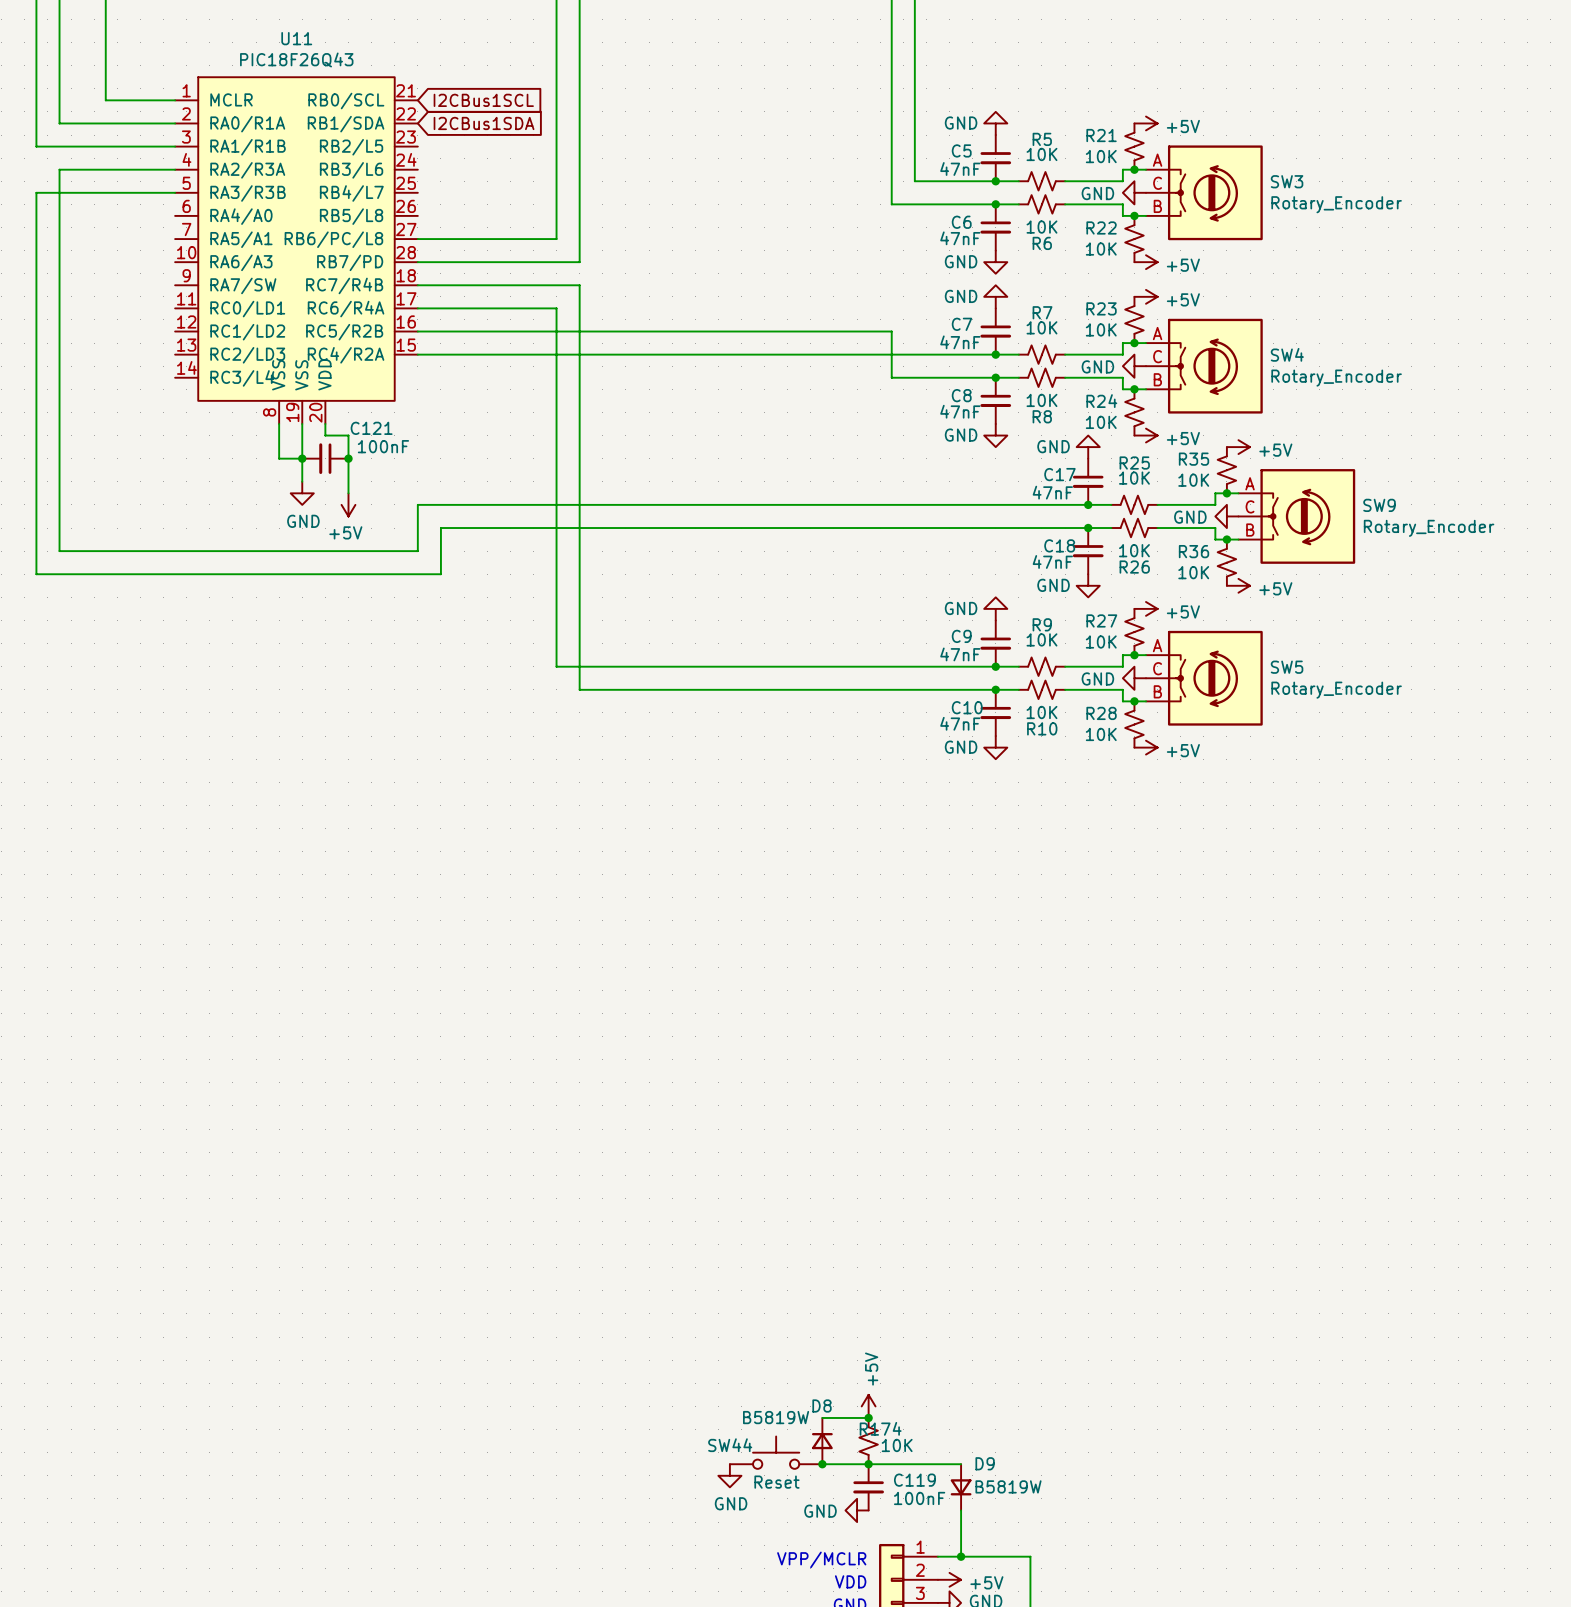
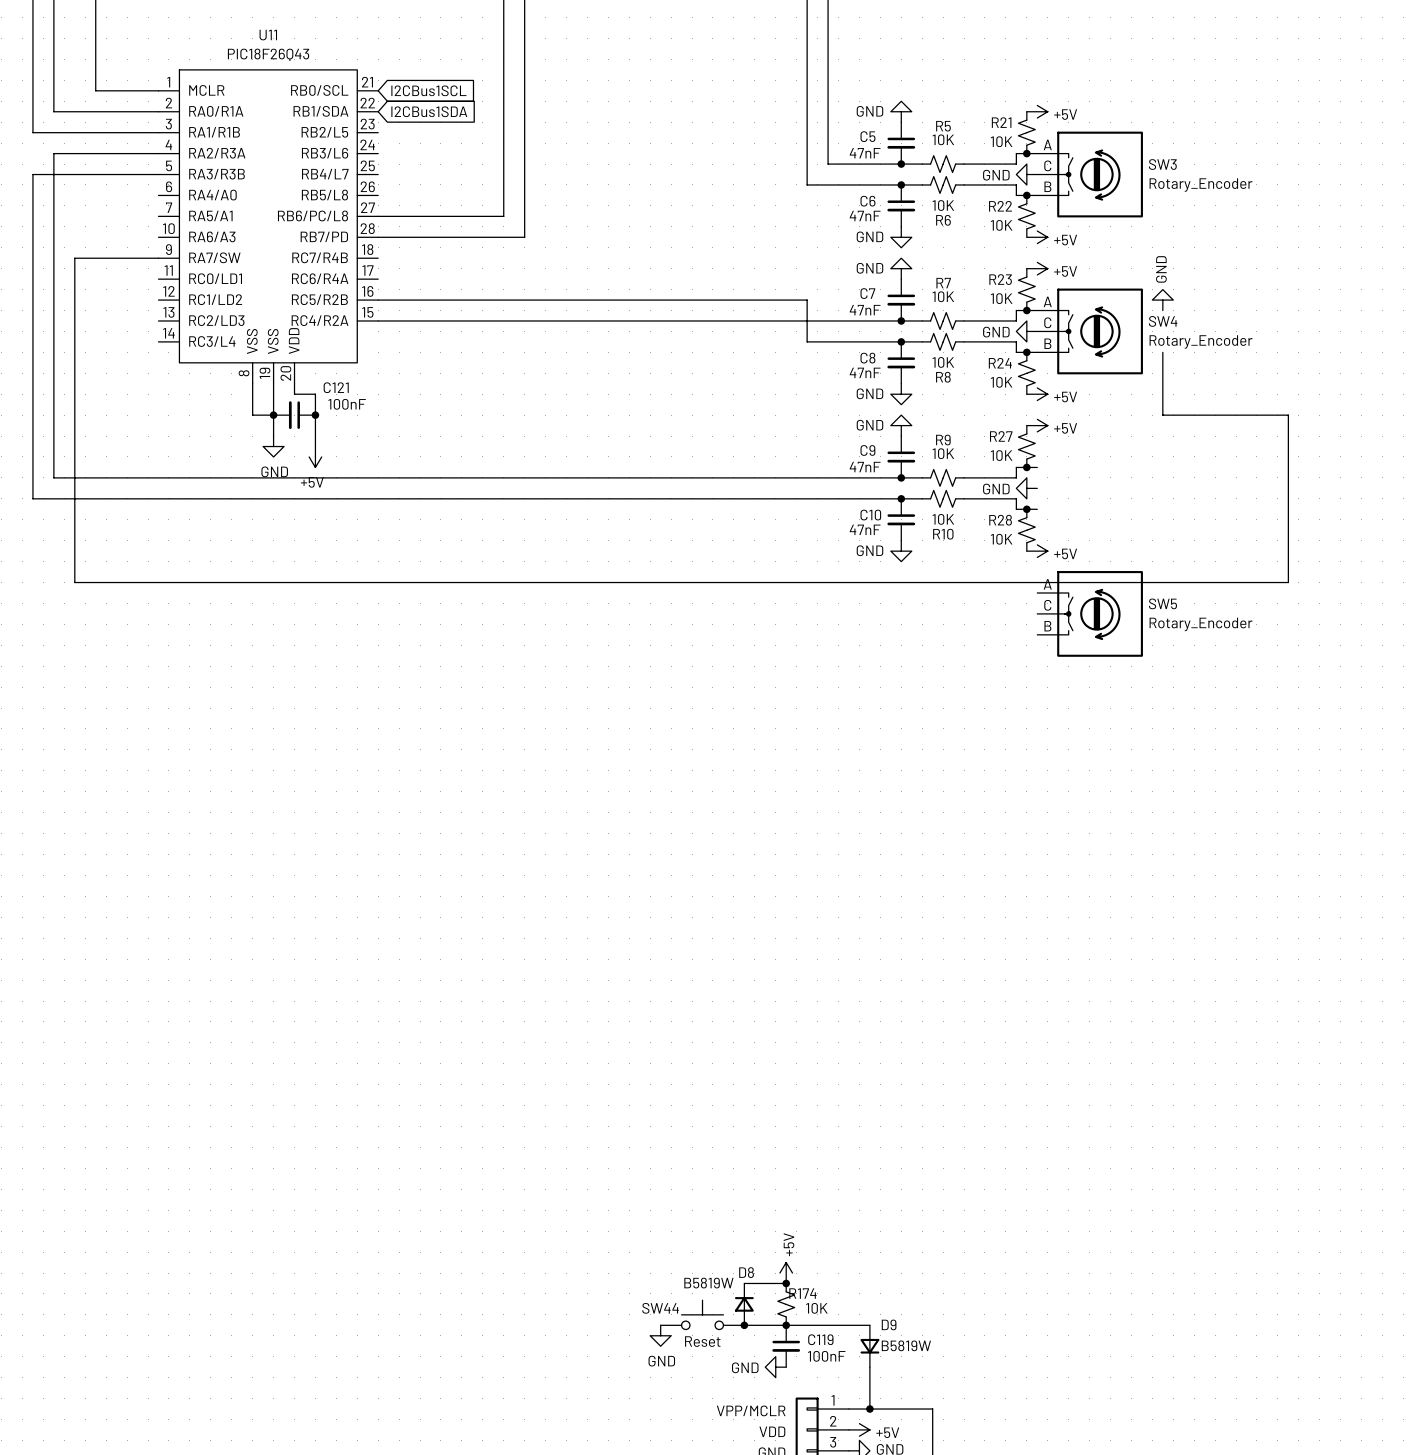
wire: none -> (158, 258) (74, 258) (74, 582) (1288, 582) (1288, 415) (1162, 415) (1162, 352)
wire: (417, 285) (579, 285) (579, 689) (1018, 689) -> none
wire: (417, 308) (556, 308) (556, 666) (1018, 666) -> none
power symbol: none -> GND (1162, 300)
power symbol: GND (1088, 447) -> none
power symbol: +5V (1238, 447) -> none
power symbol: none -> GND (901, 425)
power symbol: none -> +5V (1037, 425)
R35: 10K (1226, 470) -> none
C17: 47nF (1088, 481) -> none
junction: (1226, 493) -> none
wire: (1238, 493) (1215, 493) (1215, 504) (1157, 504) -> none
junction: (1088, 504) -> none
wire: (1111, 504) (417, 504) (417, 551) -> (922, 498) (378, 498)
R25: 10K (1134, 504) -> none
junction: none -> (1026, 467)
wire: none -> (1037, 467) (1016, 467) (1016, 477) (1005, 477)
power symbol: GND (1226, 516) -> none
SW9: Rotary_Encoder (1296, 516) -> none
wire: (59, 528) (59, 551) -> (32, 498) (53, 498)
wire: (440, 528) (440, 574) (36, 574) (36, 551) -> (399, 477) (53, 477)
junction: none -> (901, 477)
junction: (1088, 528) -> none
R26: 10K (1134, 528) -> none
wire: (1157, 528) (1215, 528) (1215, 539) (1238, 539) -> (964, 498) (1016, 498) (1016, 509) (1037, 509)
power symbol: none -> GND (1026, 488)
junction: (1226, 539) -> none
junction: none -> (901, 498)
C18: 47nF (1088, 551) -> none
junction: none -> (1026, 509)
R36: 10K (1226, 562) -> none
power symbol: GND (1088, 585) -> none
power symbol: +5V (1238, 585) -> none
power symbol rotation: 0° (995, 608) -> 180° (901, 551)
R27 position: (1134, 632) -> (1026, 446)
C9 position: (995, 643) -> (901, 456)
junction: (1134, 655) -> none
wire: (1146, 655) (1122, 655) (1122, 666) (1065, 666) -> none
junction: (995, 666) -> none
R9 position: (1041, 666) -> (943, 477)
power symbol: GND (1134, 678) -> none
junction: (995, 689) -> none
R10 position: (1041, 689) -> (943, 498)
wire: (1065, 689) (1122, 689) (1122, 701) (1146, 701) -> none
junction: (1134, 701) -> none
C10 position: (995, 712) -> (901, 519)
R28 position: (1134, 724) -> (1026, 530)
power symbol: GND (995, 747) -> none
power symbol: +5V (1146, 747) -> none

